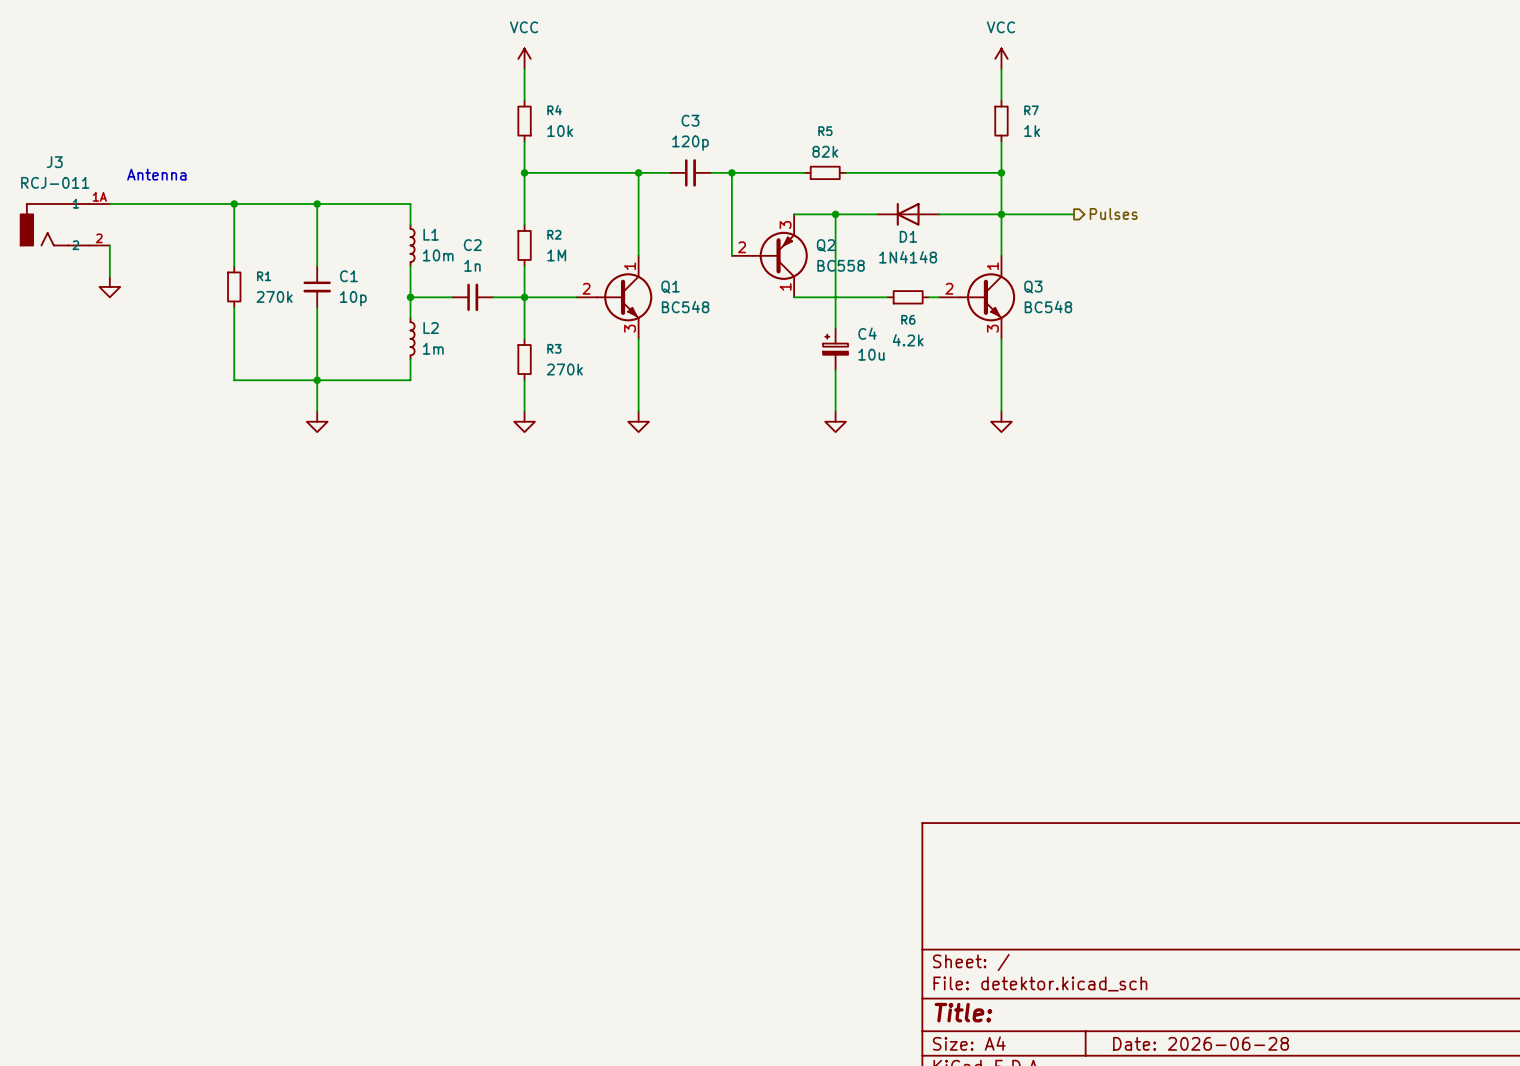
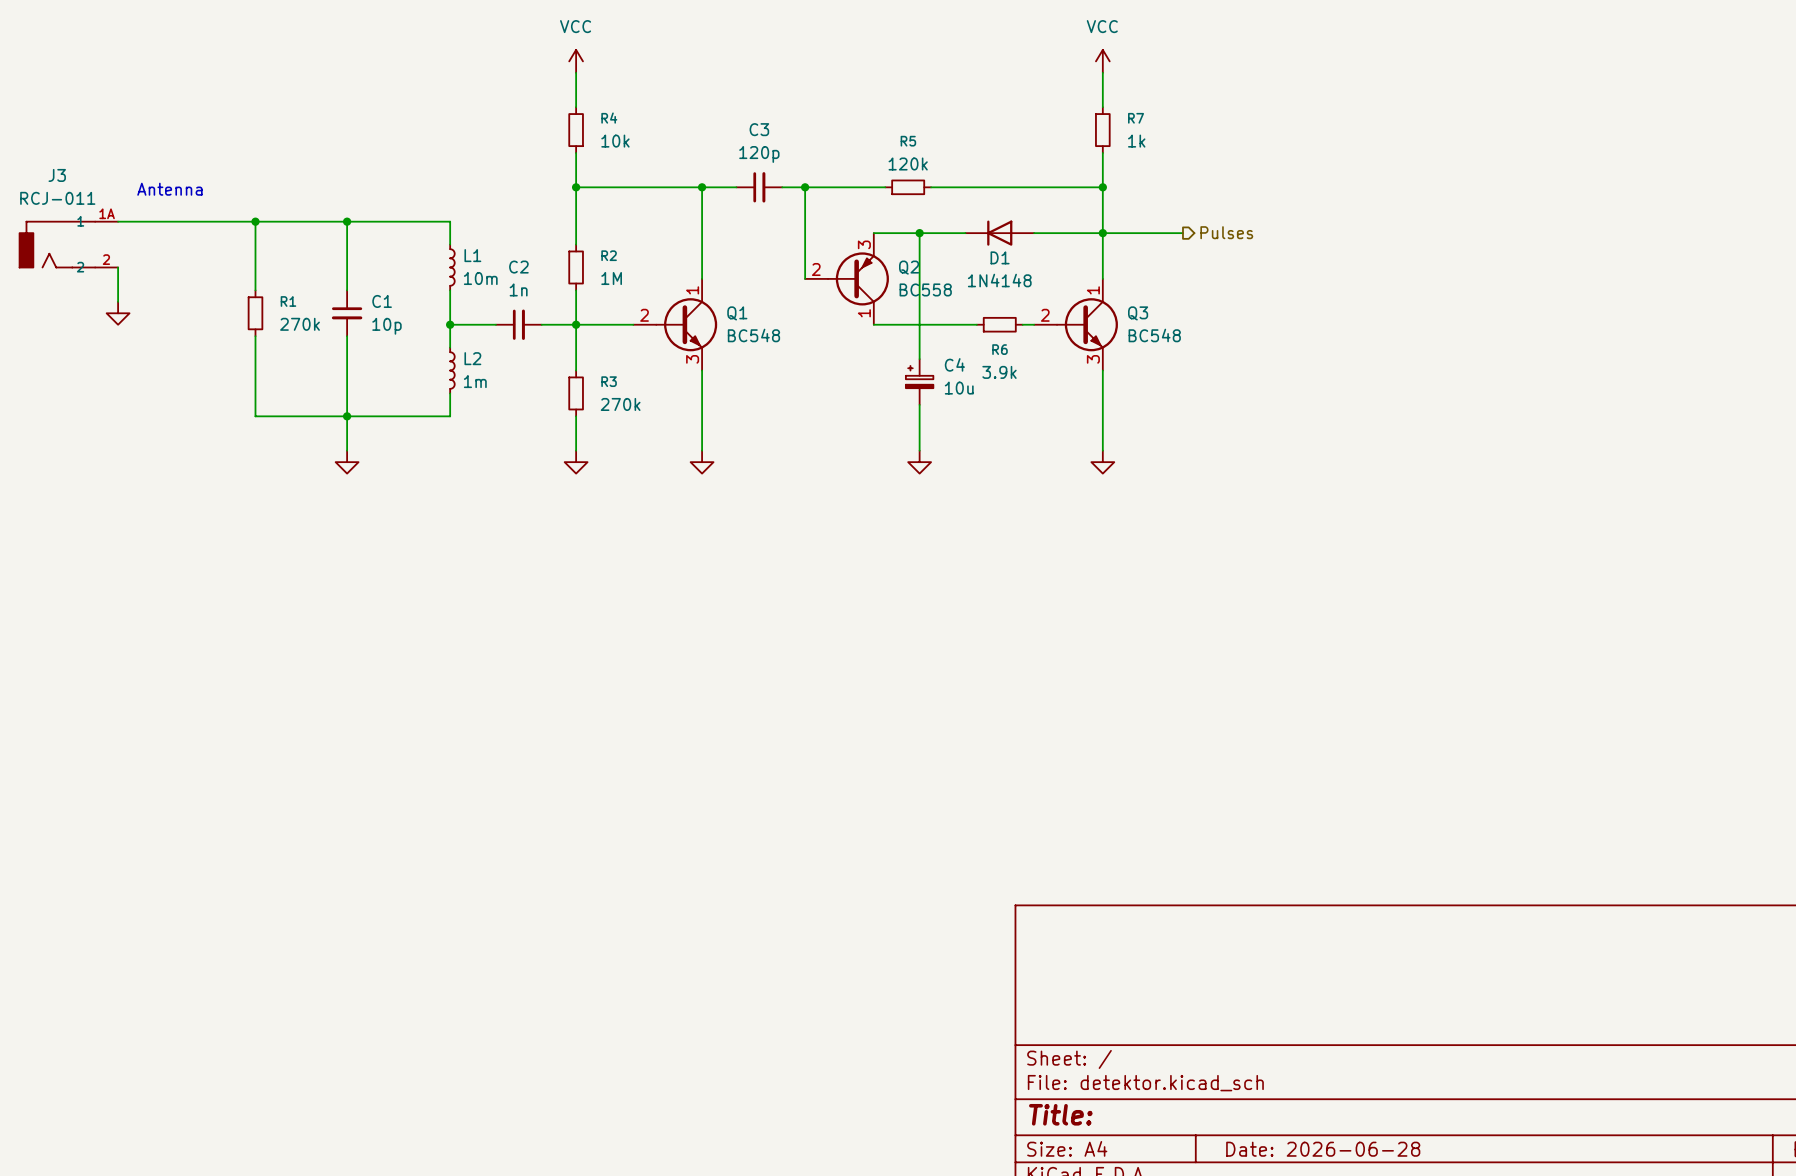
R5 value: 82k (825, 151) -> 120k (908, 164)
R6 value: 4.2k (908, 340) -> 3.9k (999, 372)

